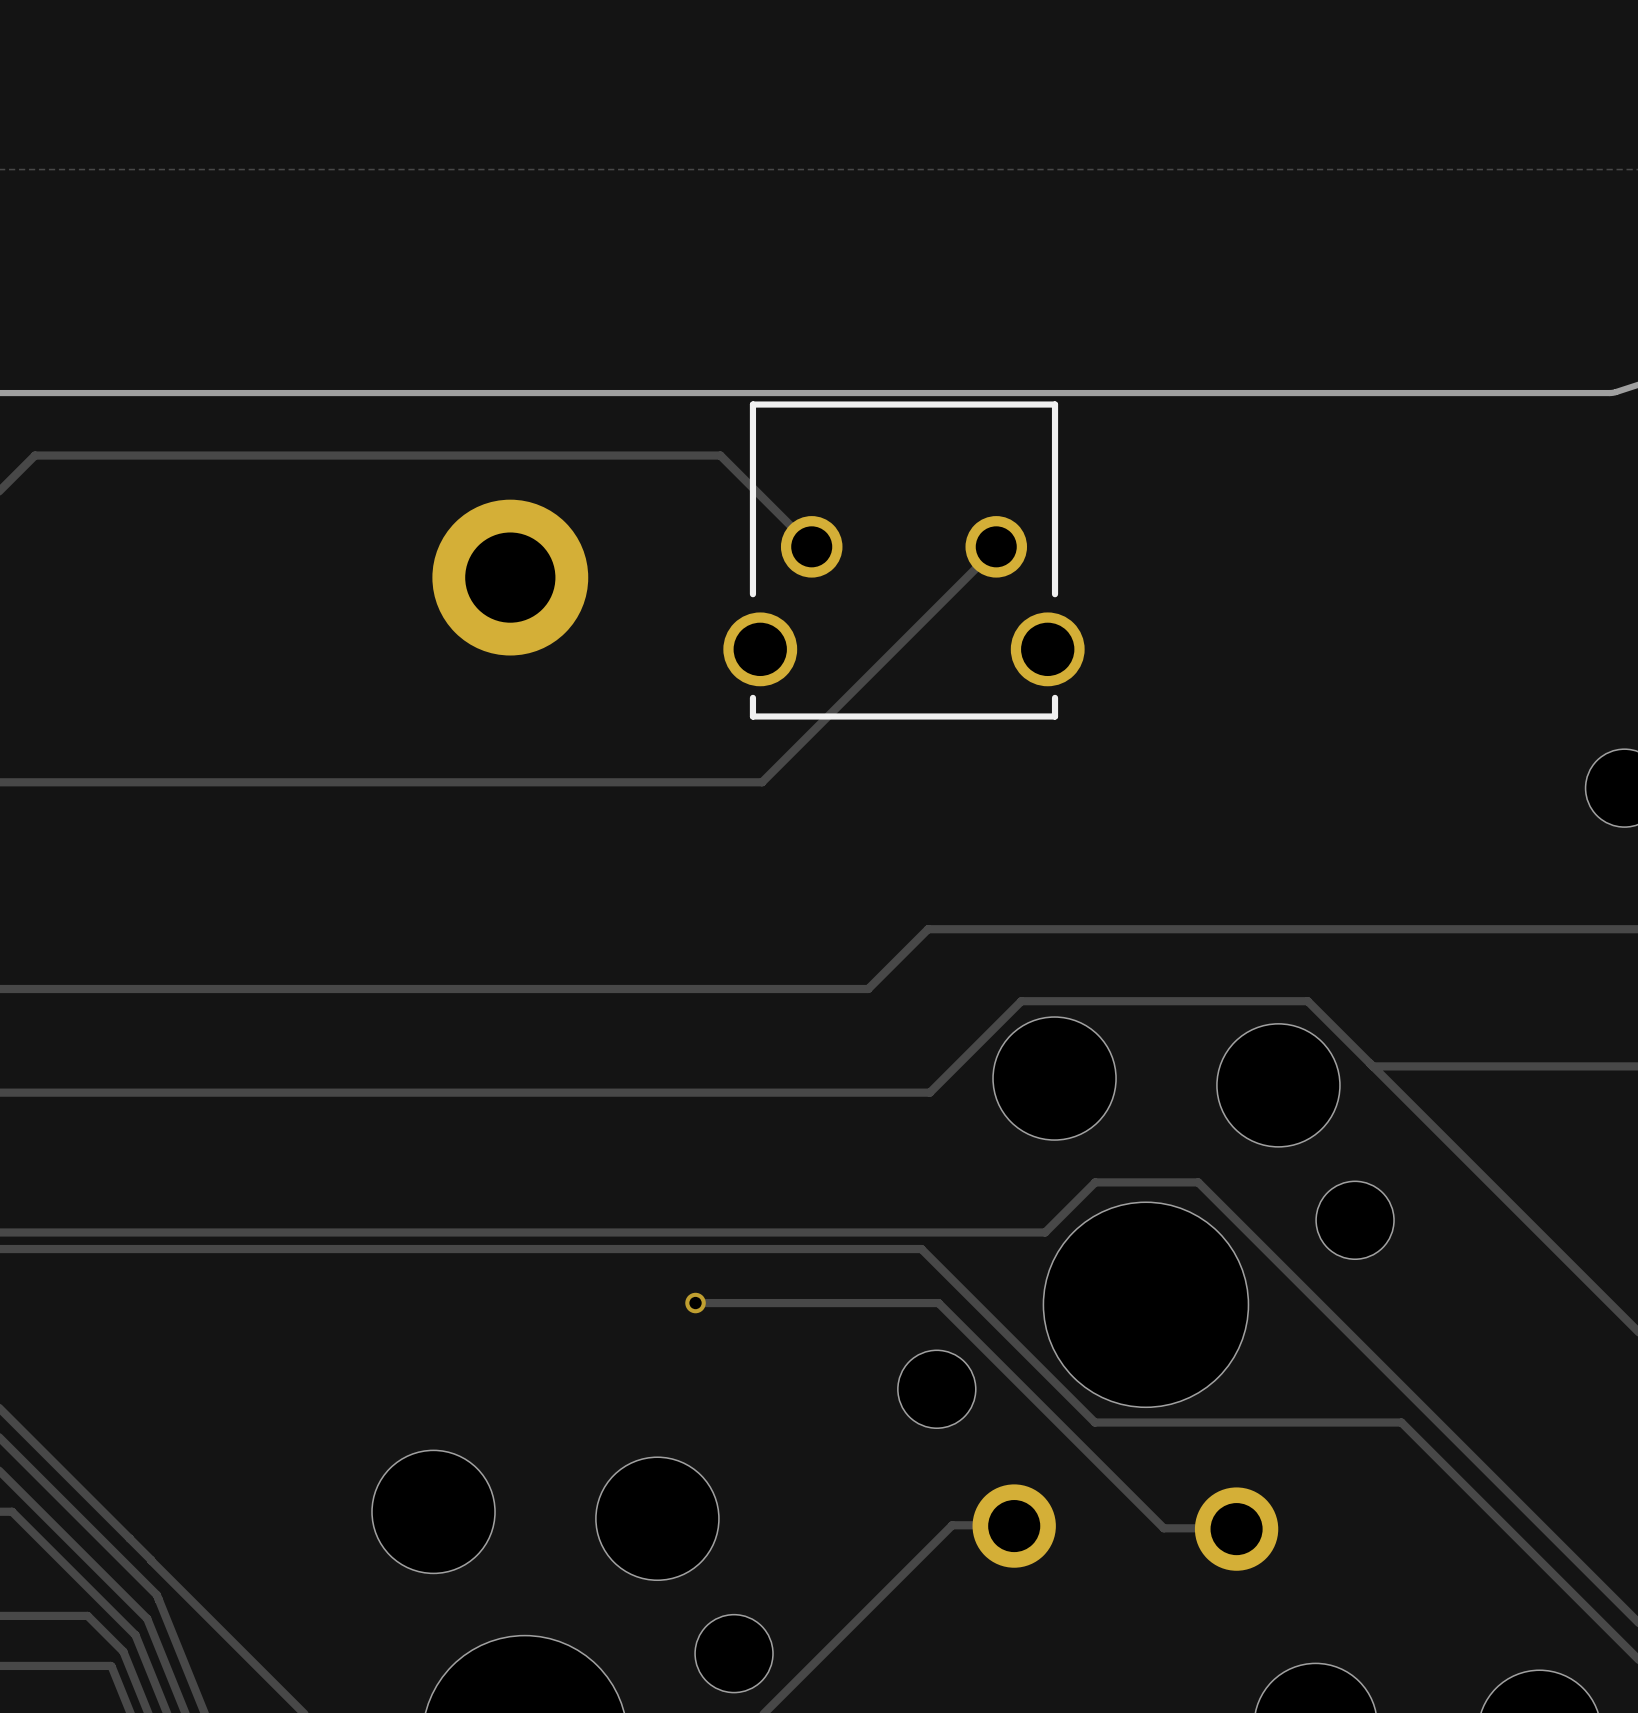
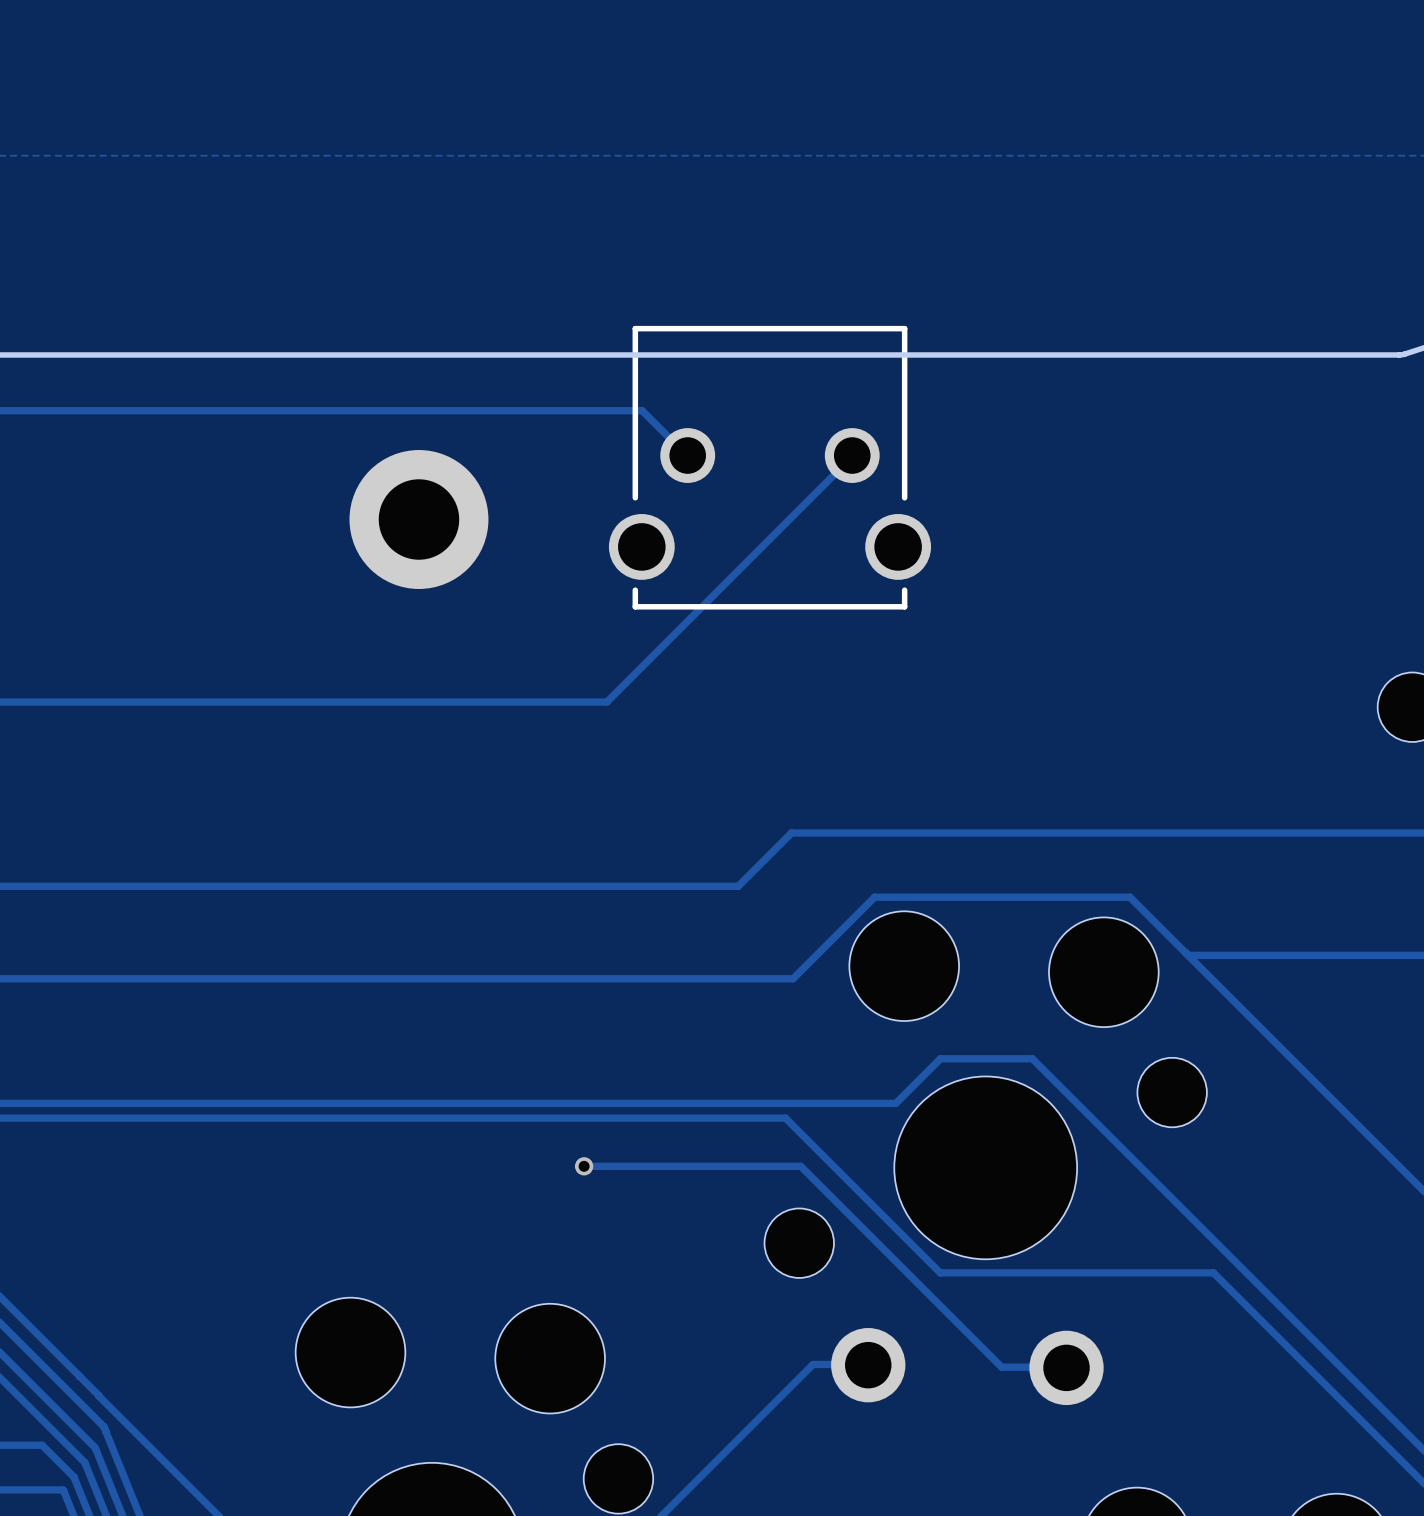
track: (720, 455) (811, 546) -> (606, 410) (642, 410) (686, 454)
track: (998, 546) (762, 782) (721, 782) -> (854, 454) (606, 702)
part position: (903, 560) -> (769, 467)

